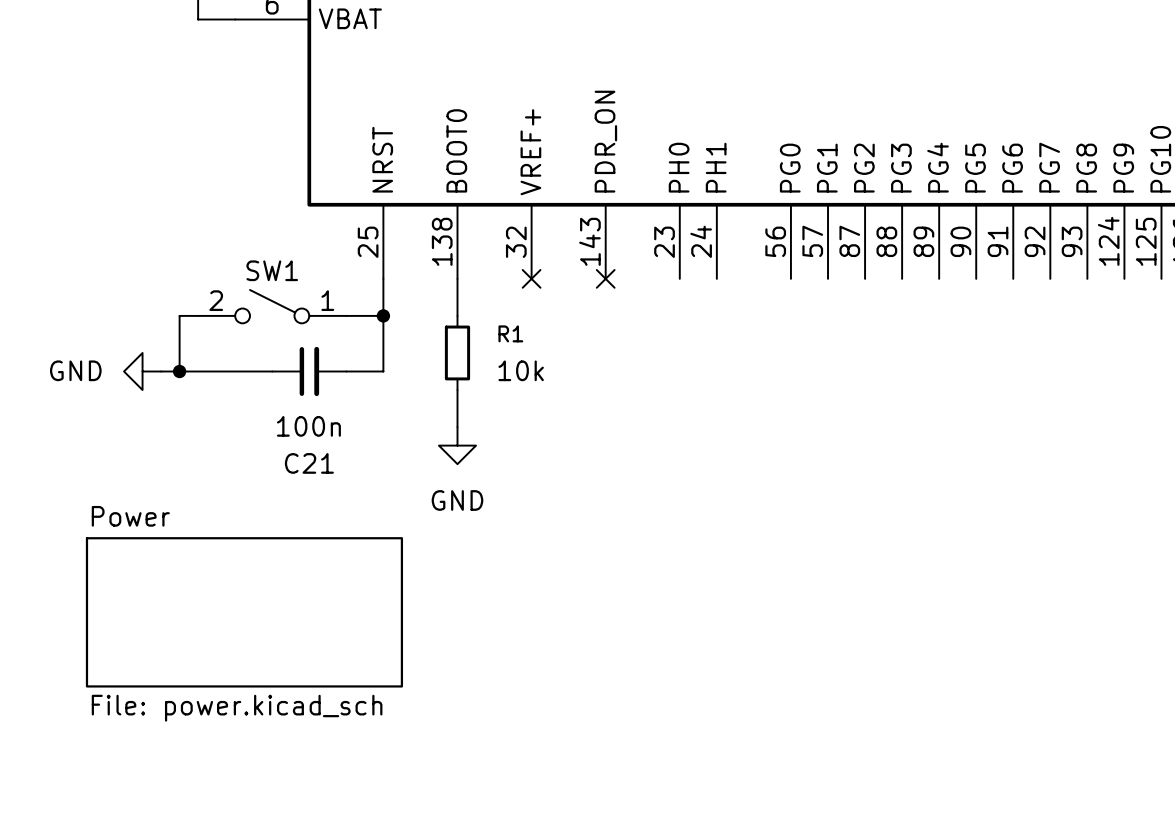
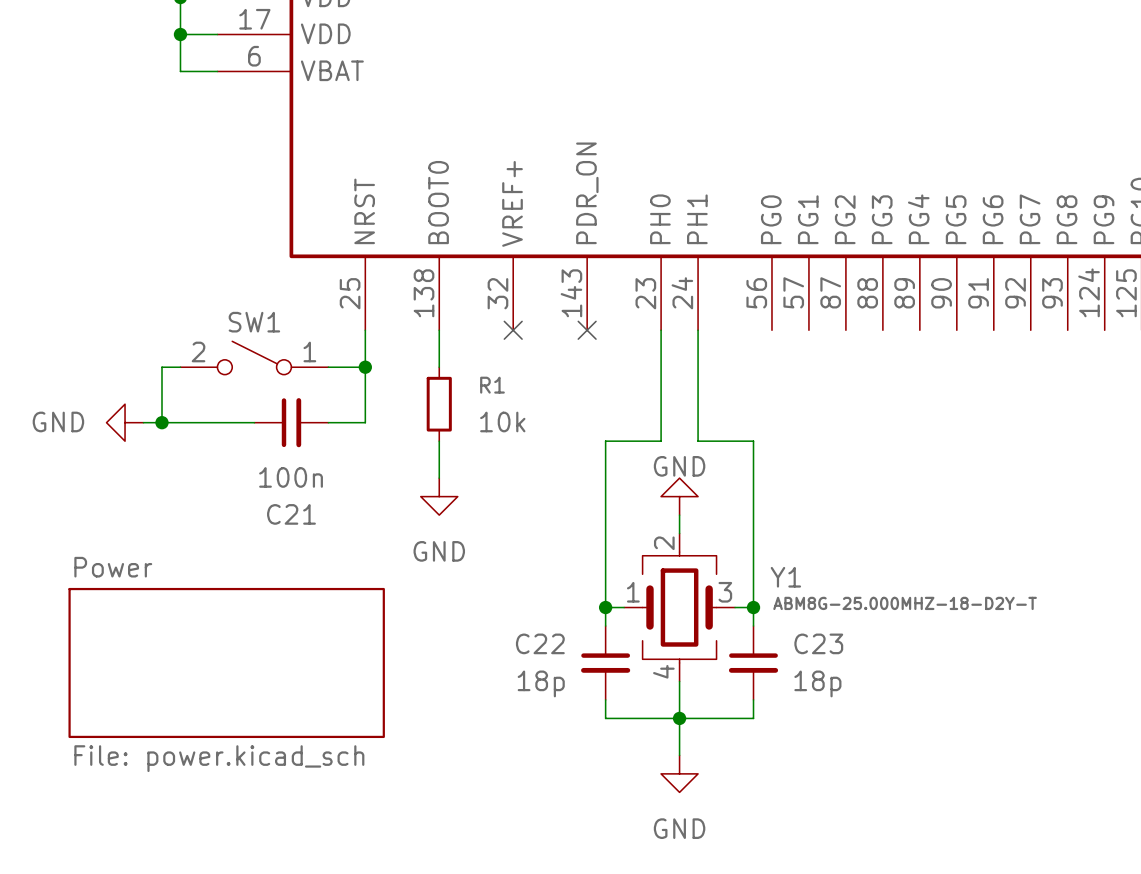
wire: none -> (661, 330) (661, 441) (605, 441) (605, 626)
wire: none -> (698, 330) (698, 441) (753, 441) (753, 626)
power symbol: none -> GND (679, 496)
wire: none -> (679, 515) (679, 533)
wire: none -> (605, 607) (624, 607)
junction: none -> (605, 607)
Y1: none -> ABM8G-25.000MHZ-18-D2Y-T (679, 607)
wire: none -> (735, 607) (753, 607)
junction: none -> (753, 607)
C22: none -> 18p (605, 662)
C23: none -> 18p (753, 662)
wire: none -> (679, 681) (679, 755)
wire: none -> (605, 699) (605, 718) (753, 718) (753, 699)
junction: none -> (679, 718)
power symbol: none -> GND (679, 773)

